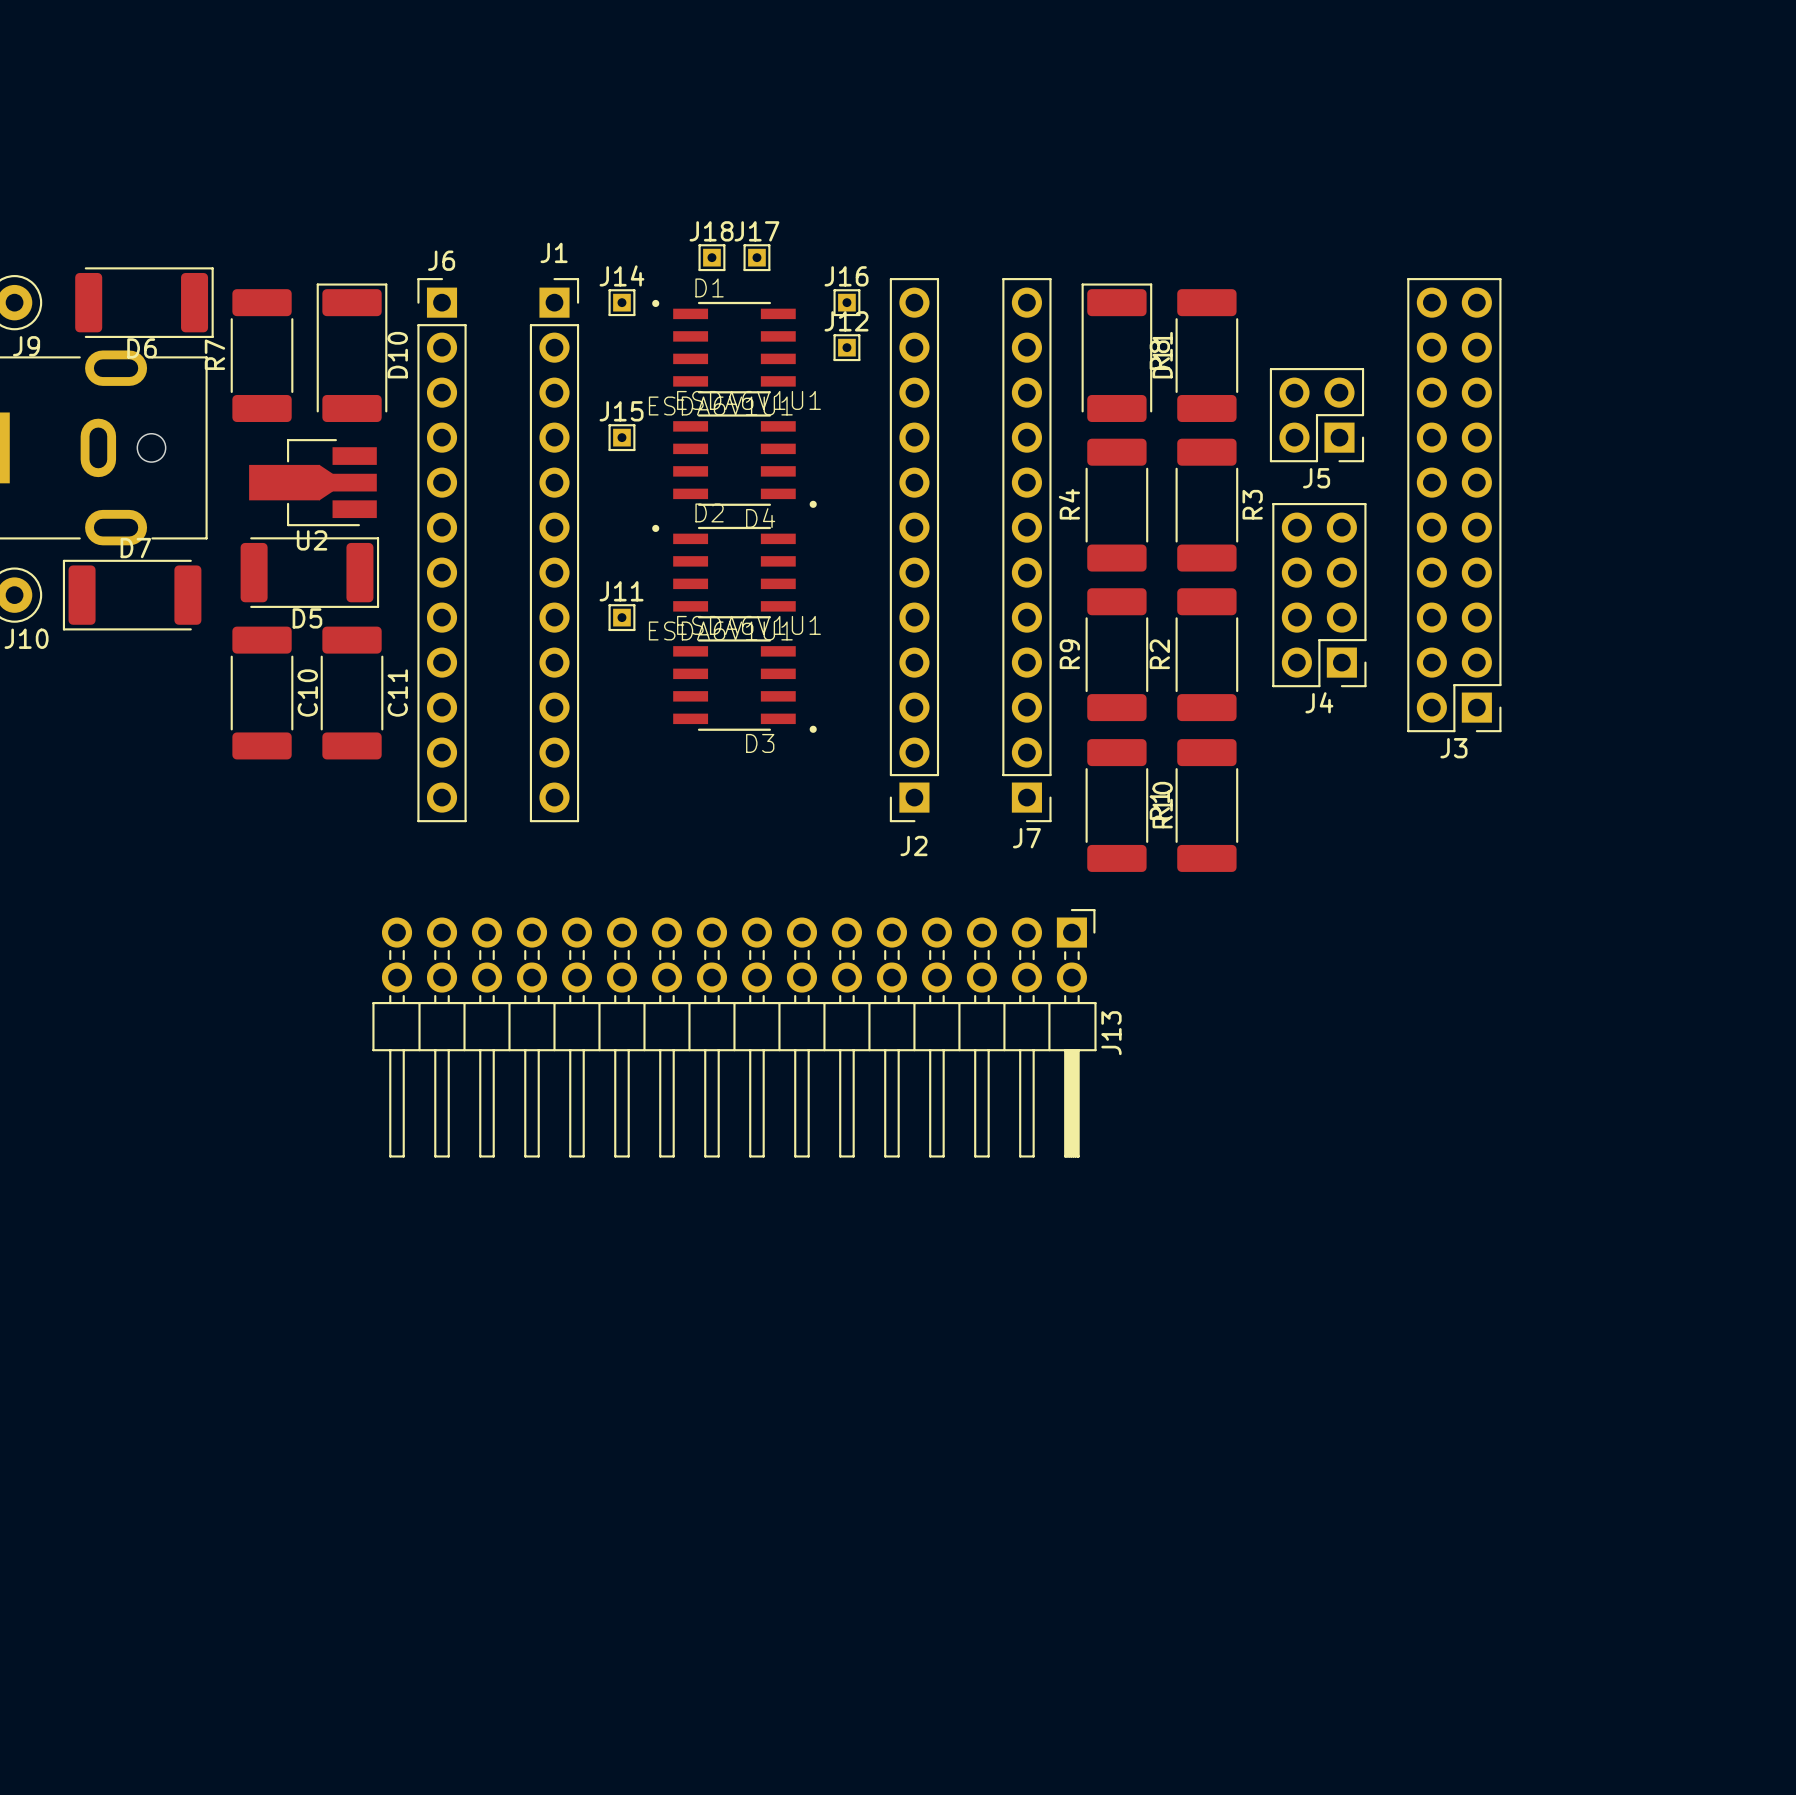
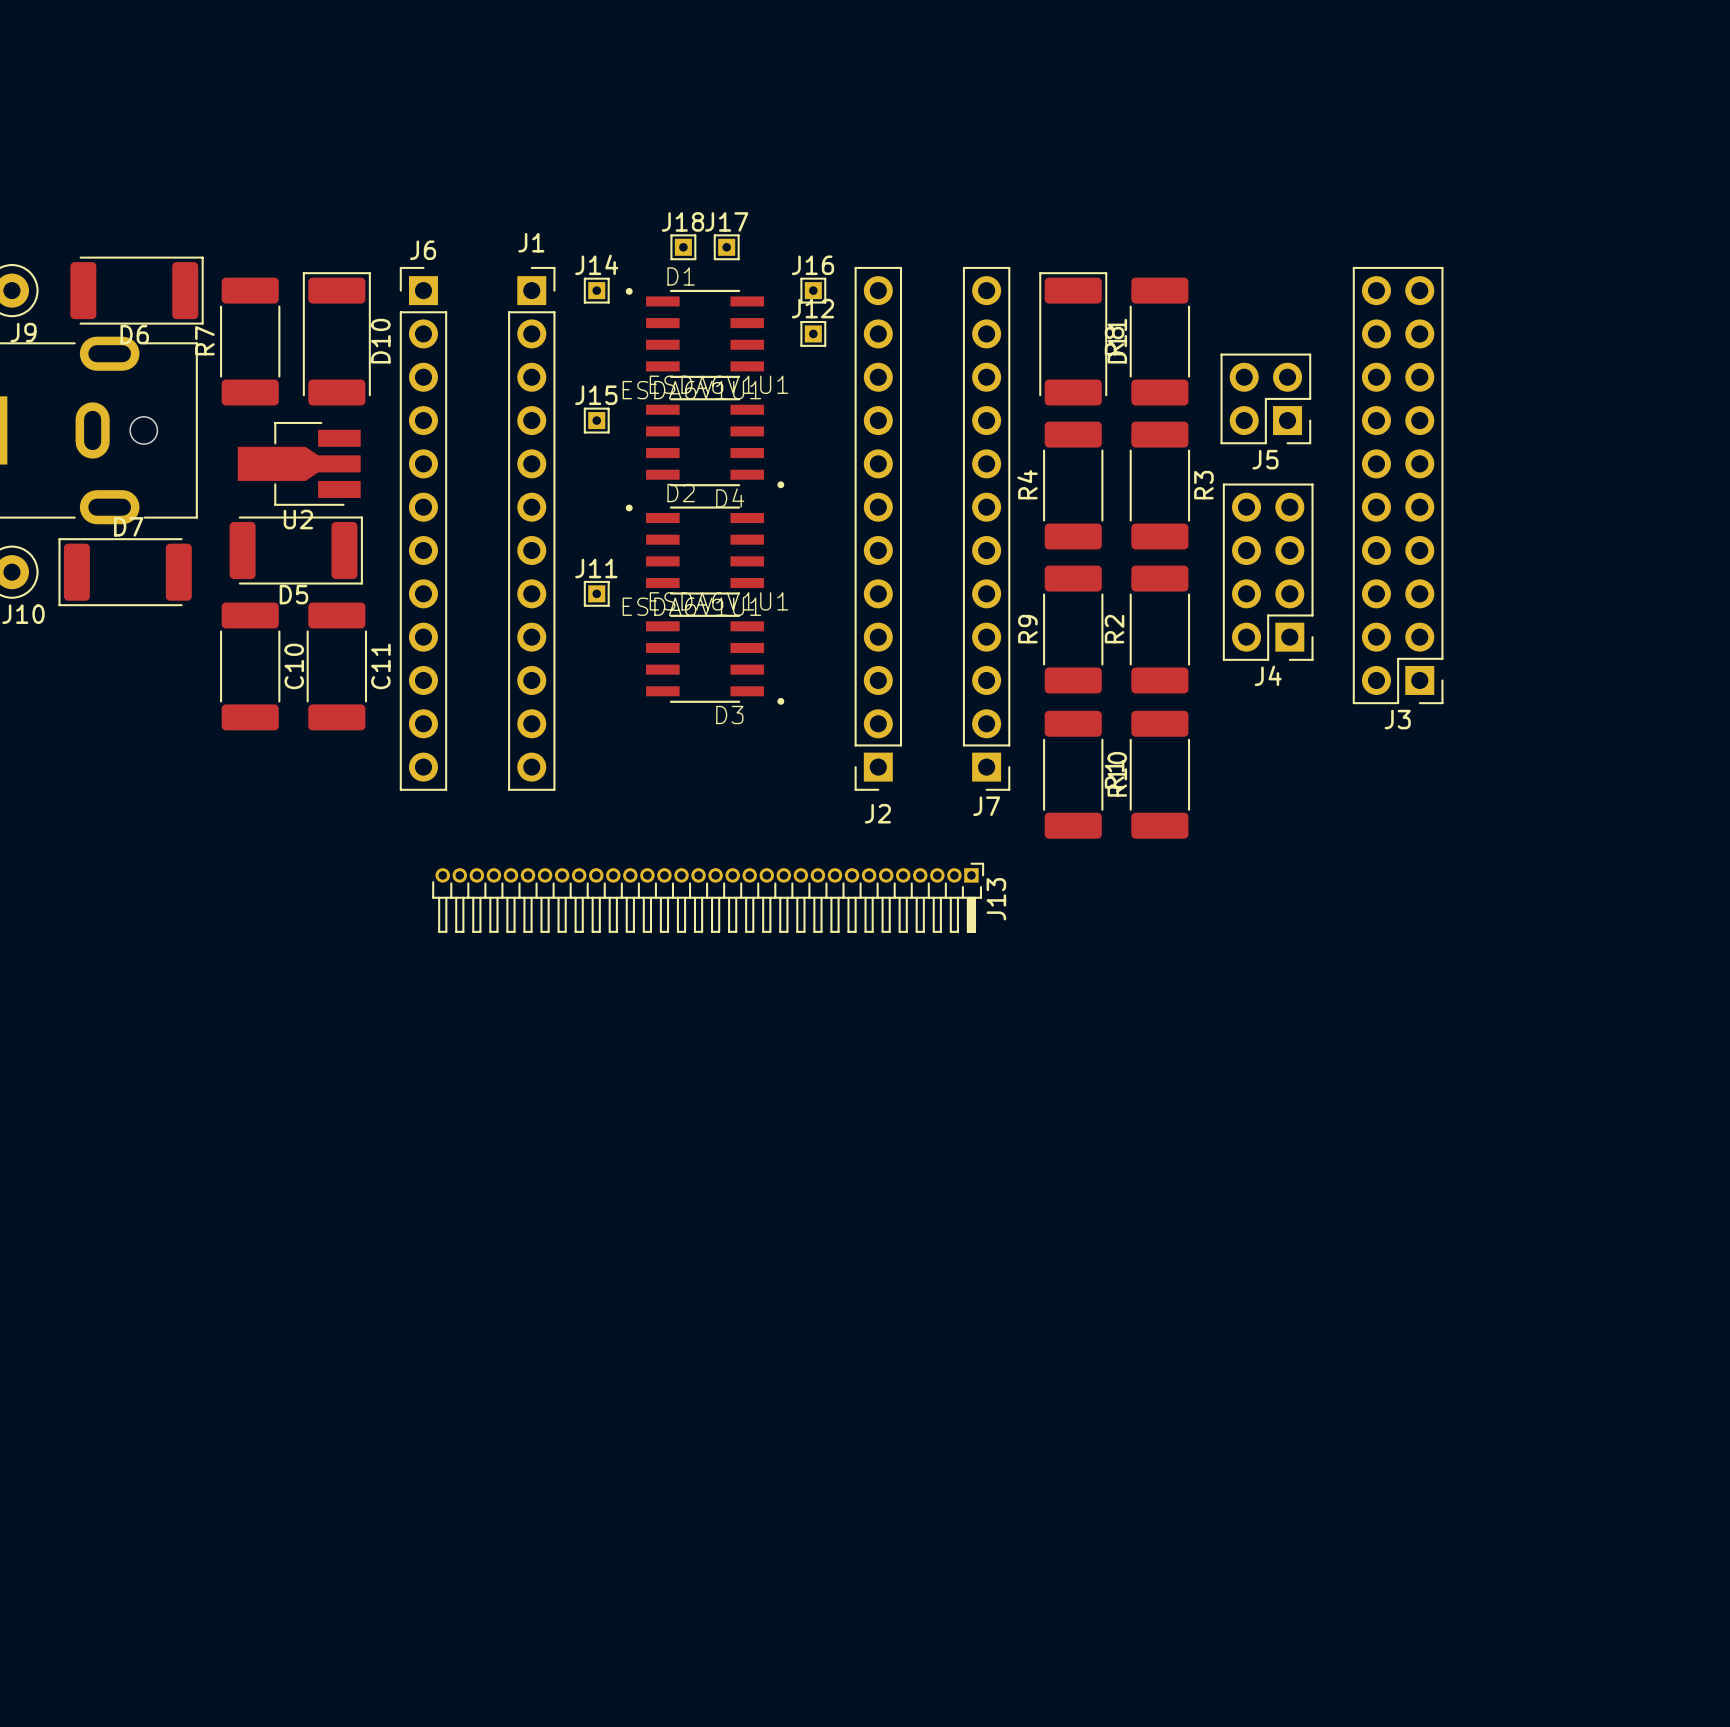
J13 footprint: [372, 909, 1097, 1158] -> [432, 862, 985, 933]
J13 name position: J13 (1111, 1033) -> J13 (996, 899)

